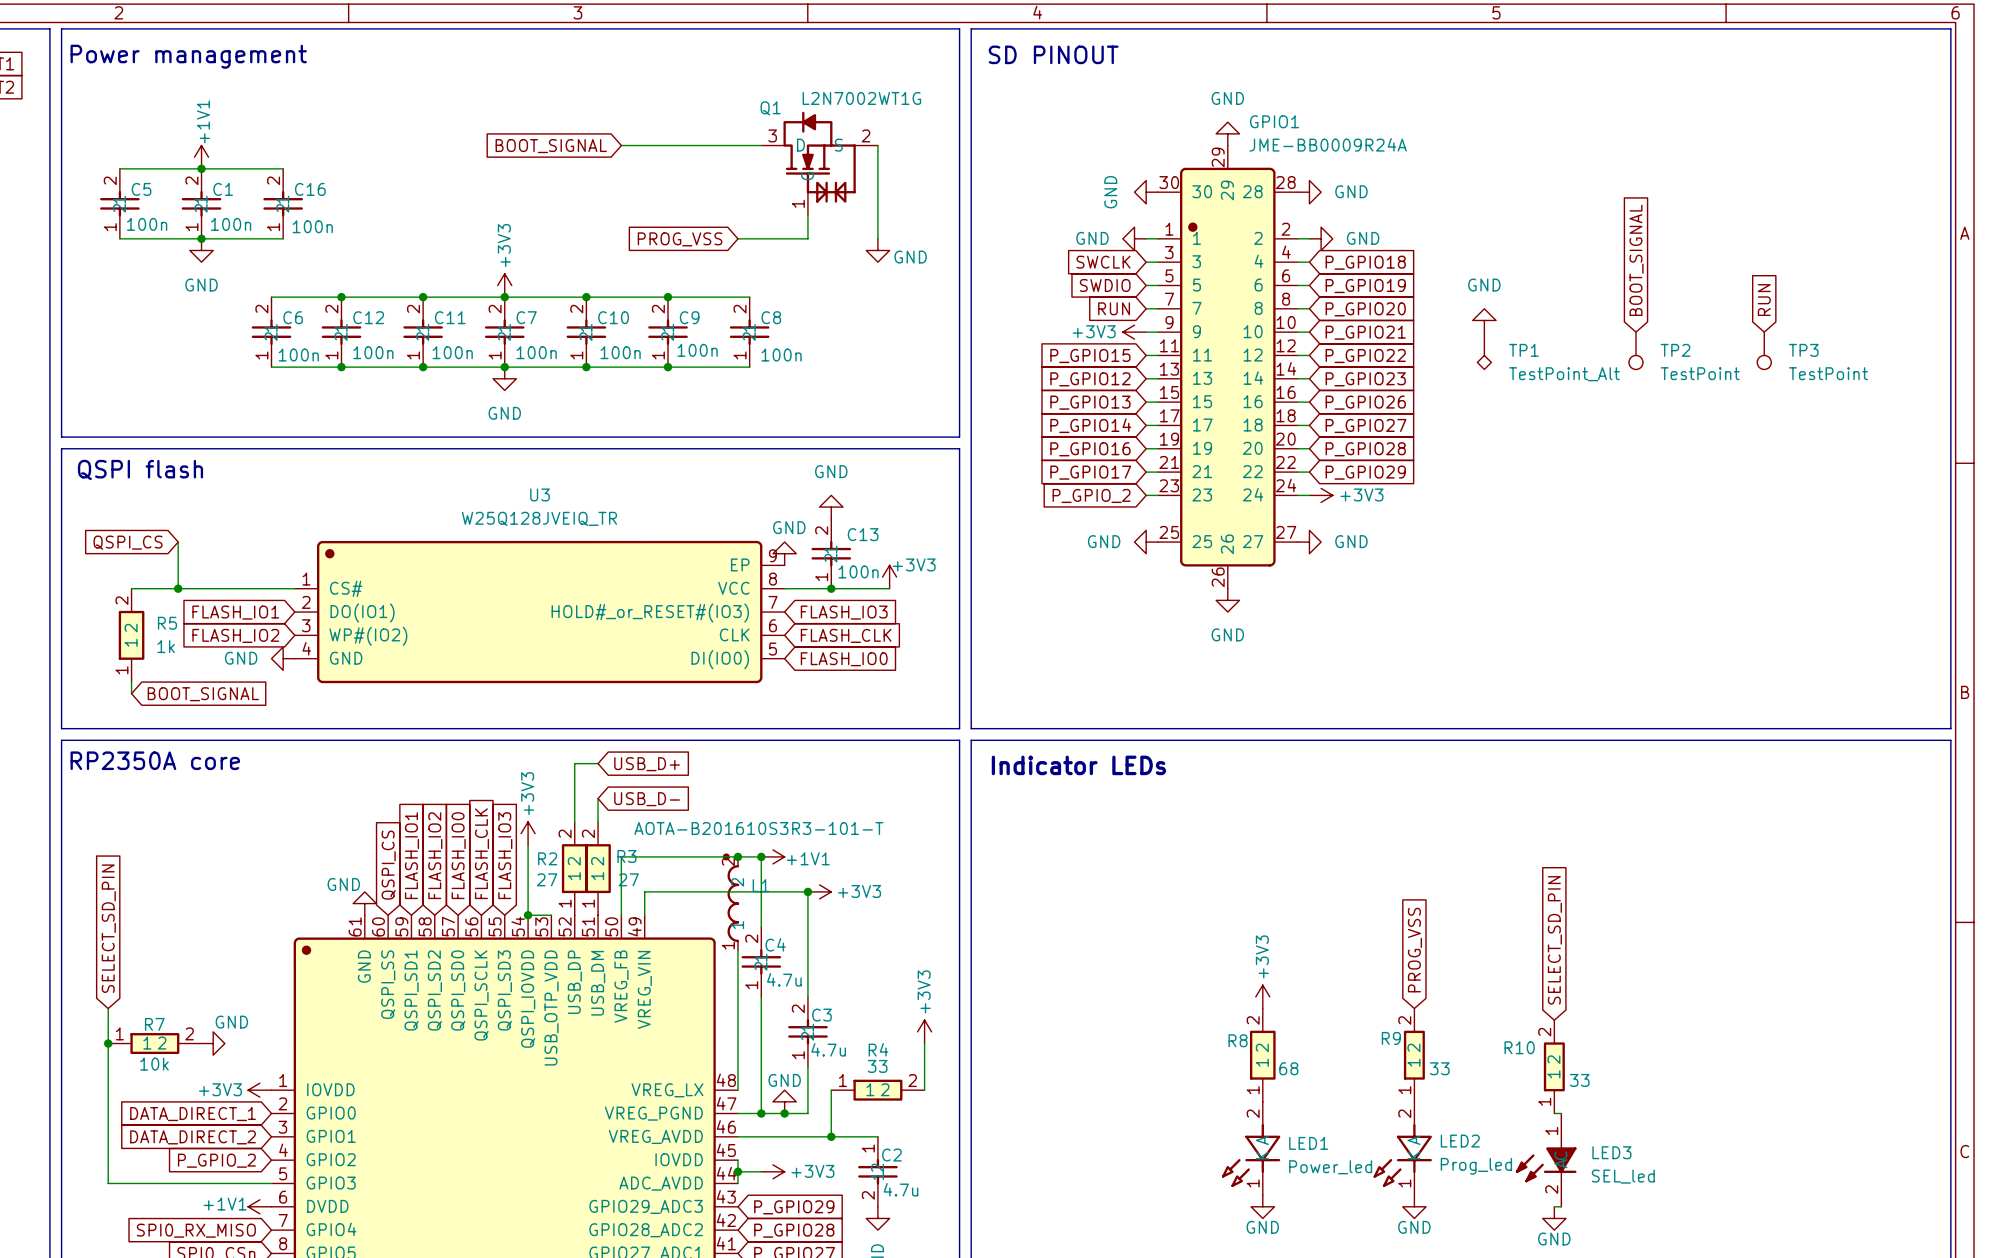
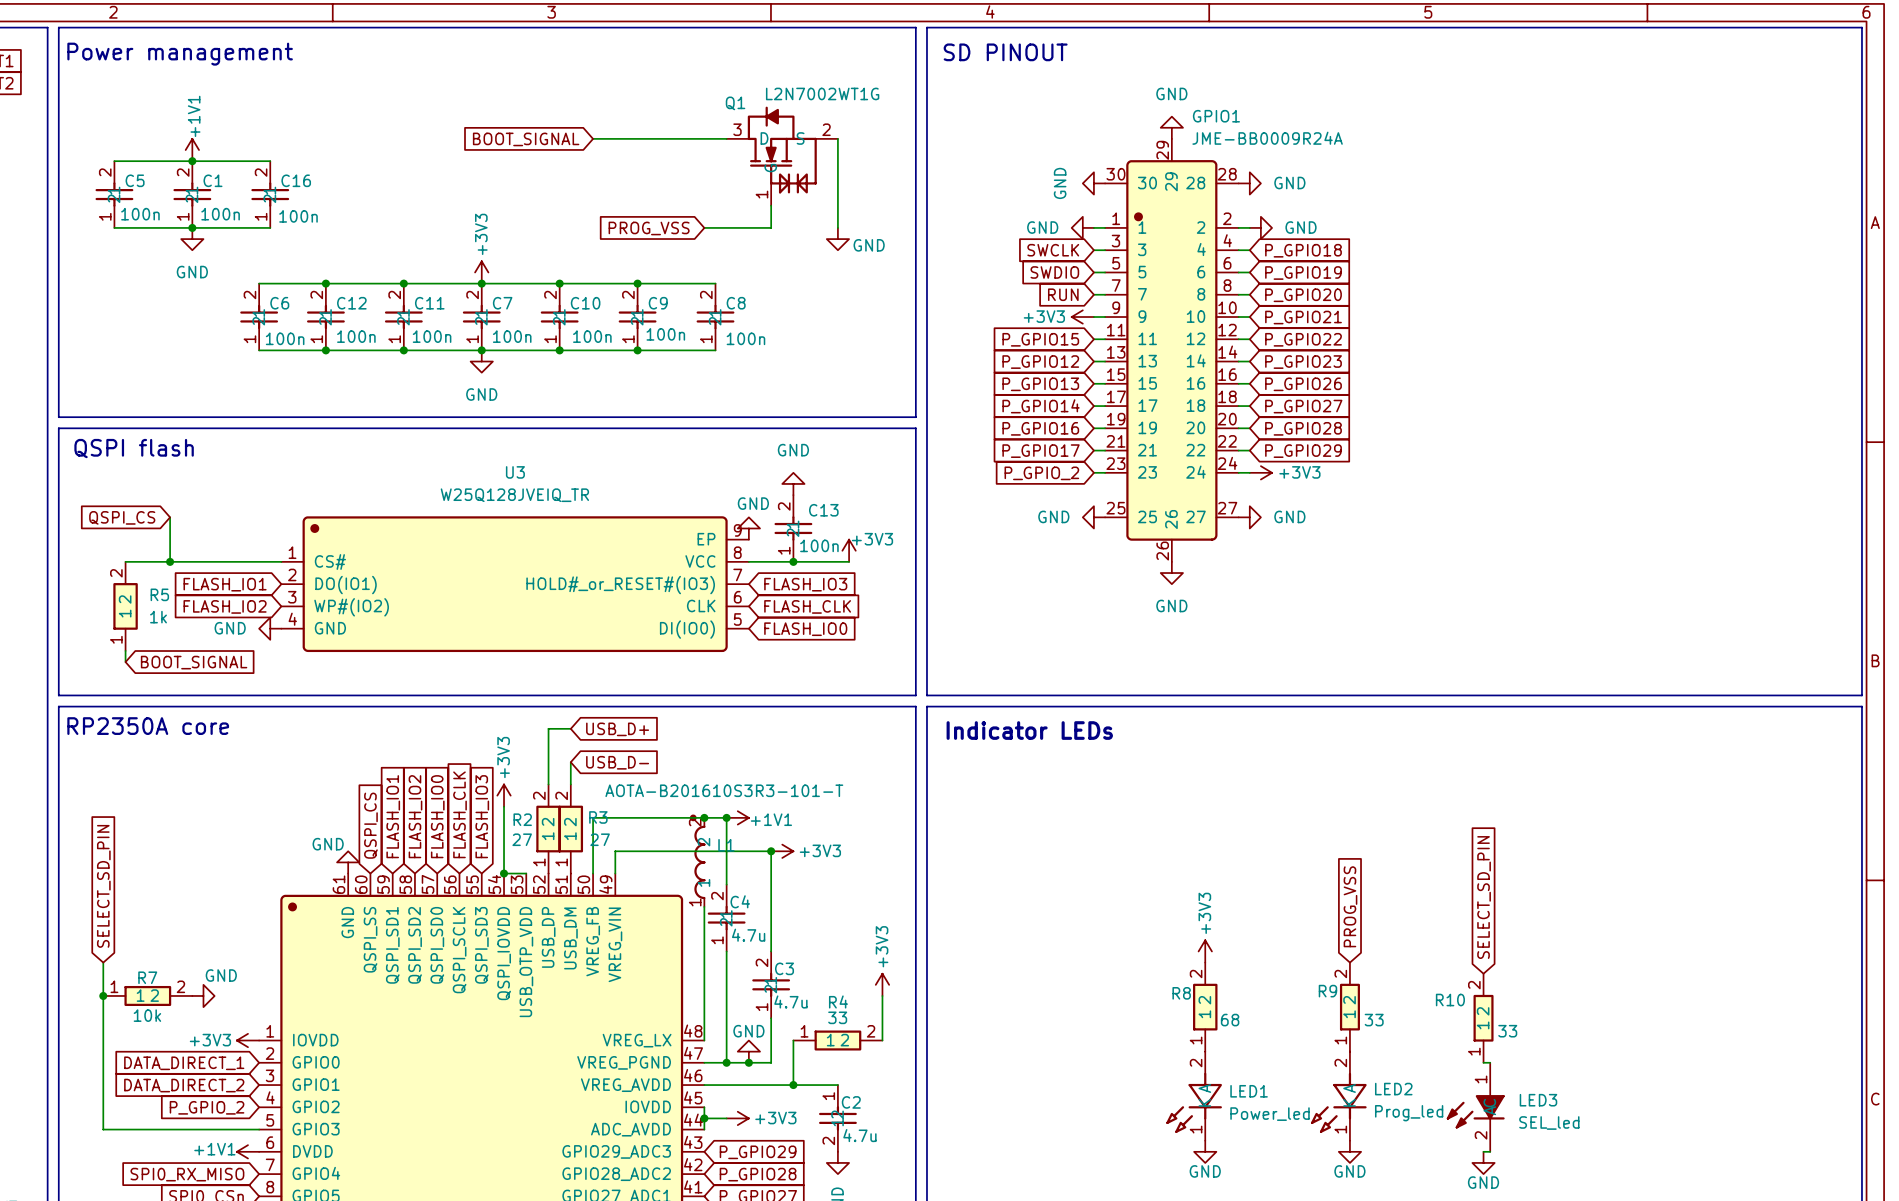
global label: BOOT_SIGNAL (1636, 260) -> none
global label: RUN (1764, 300) -> none
power symbol: GND (1484, 320) -> none
TP1: TestPoint_Alt (1484, 350) -> none
TP2: TestPoint (1635, 350) -> none
TP3: TestPoint (1764, 350) -> none

